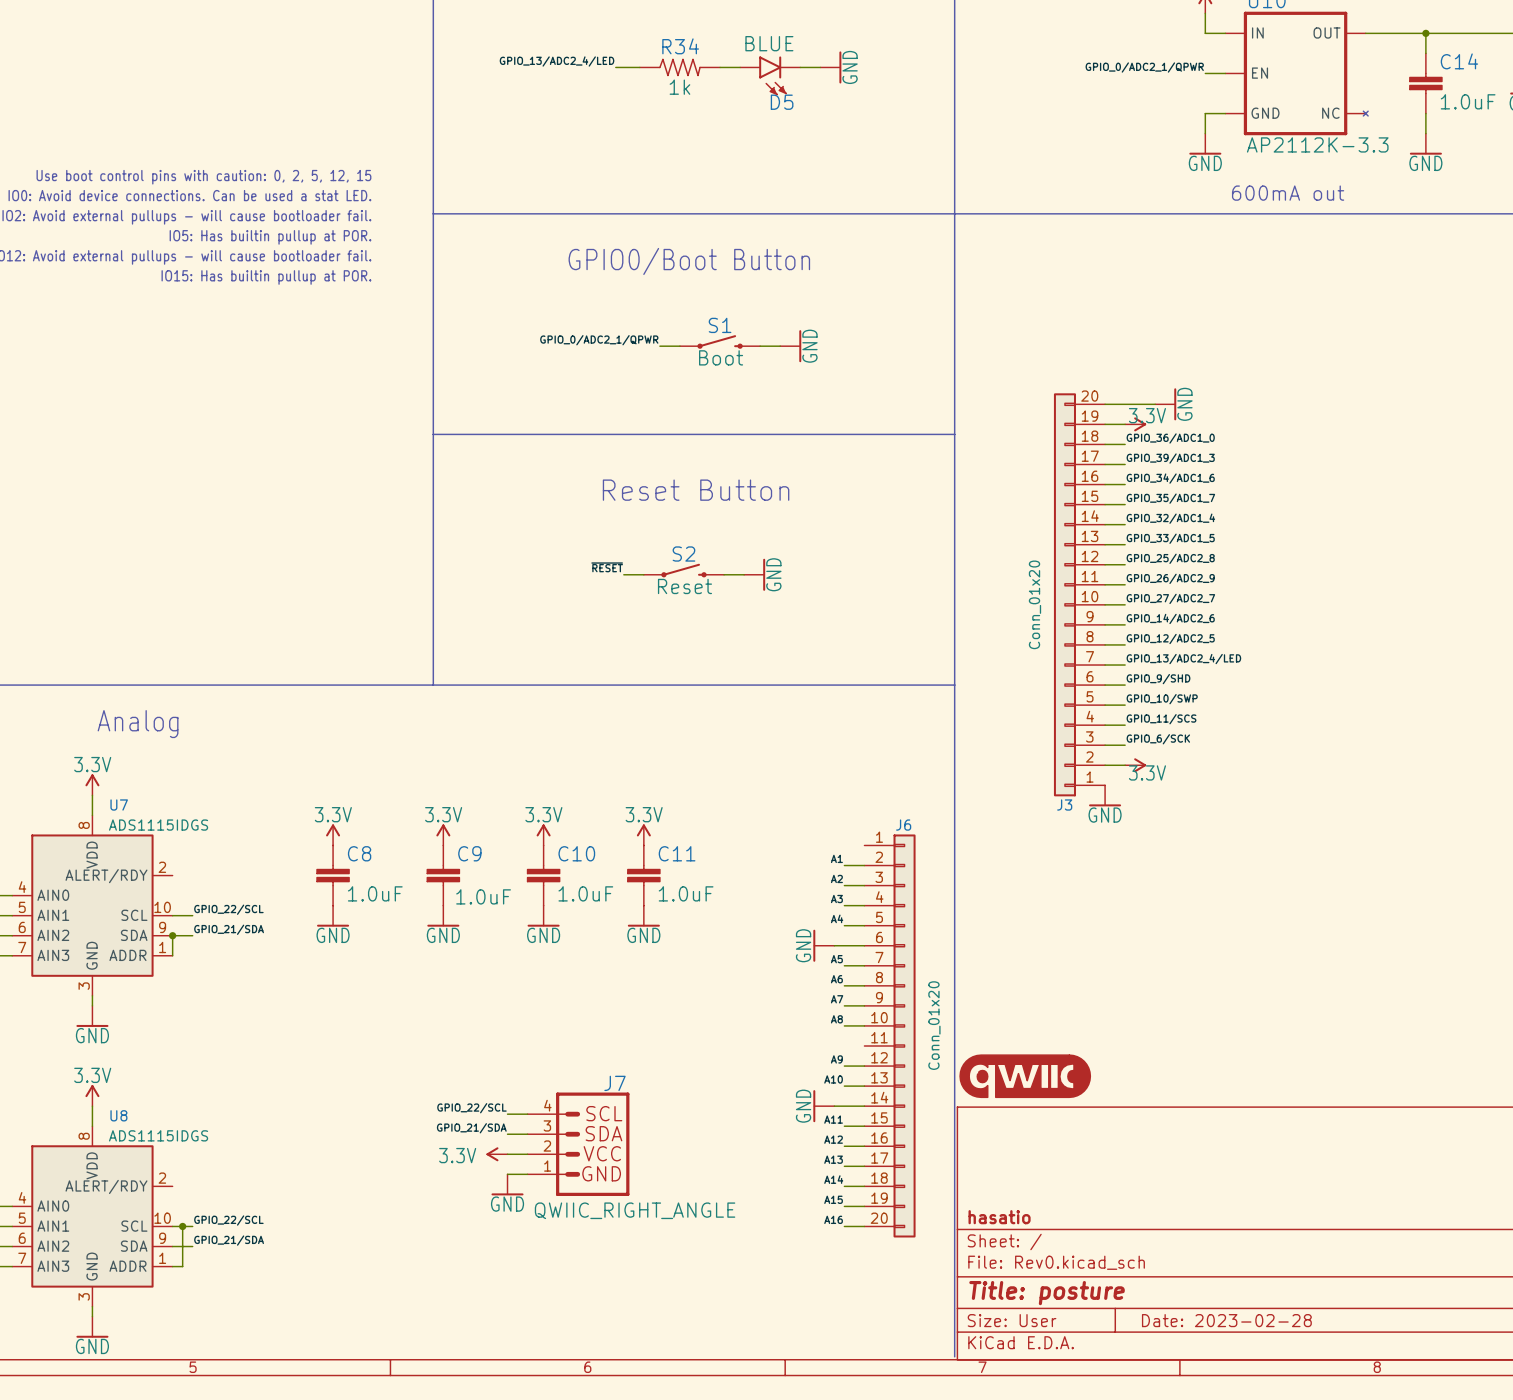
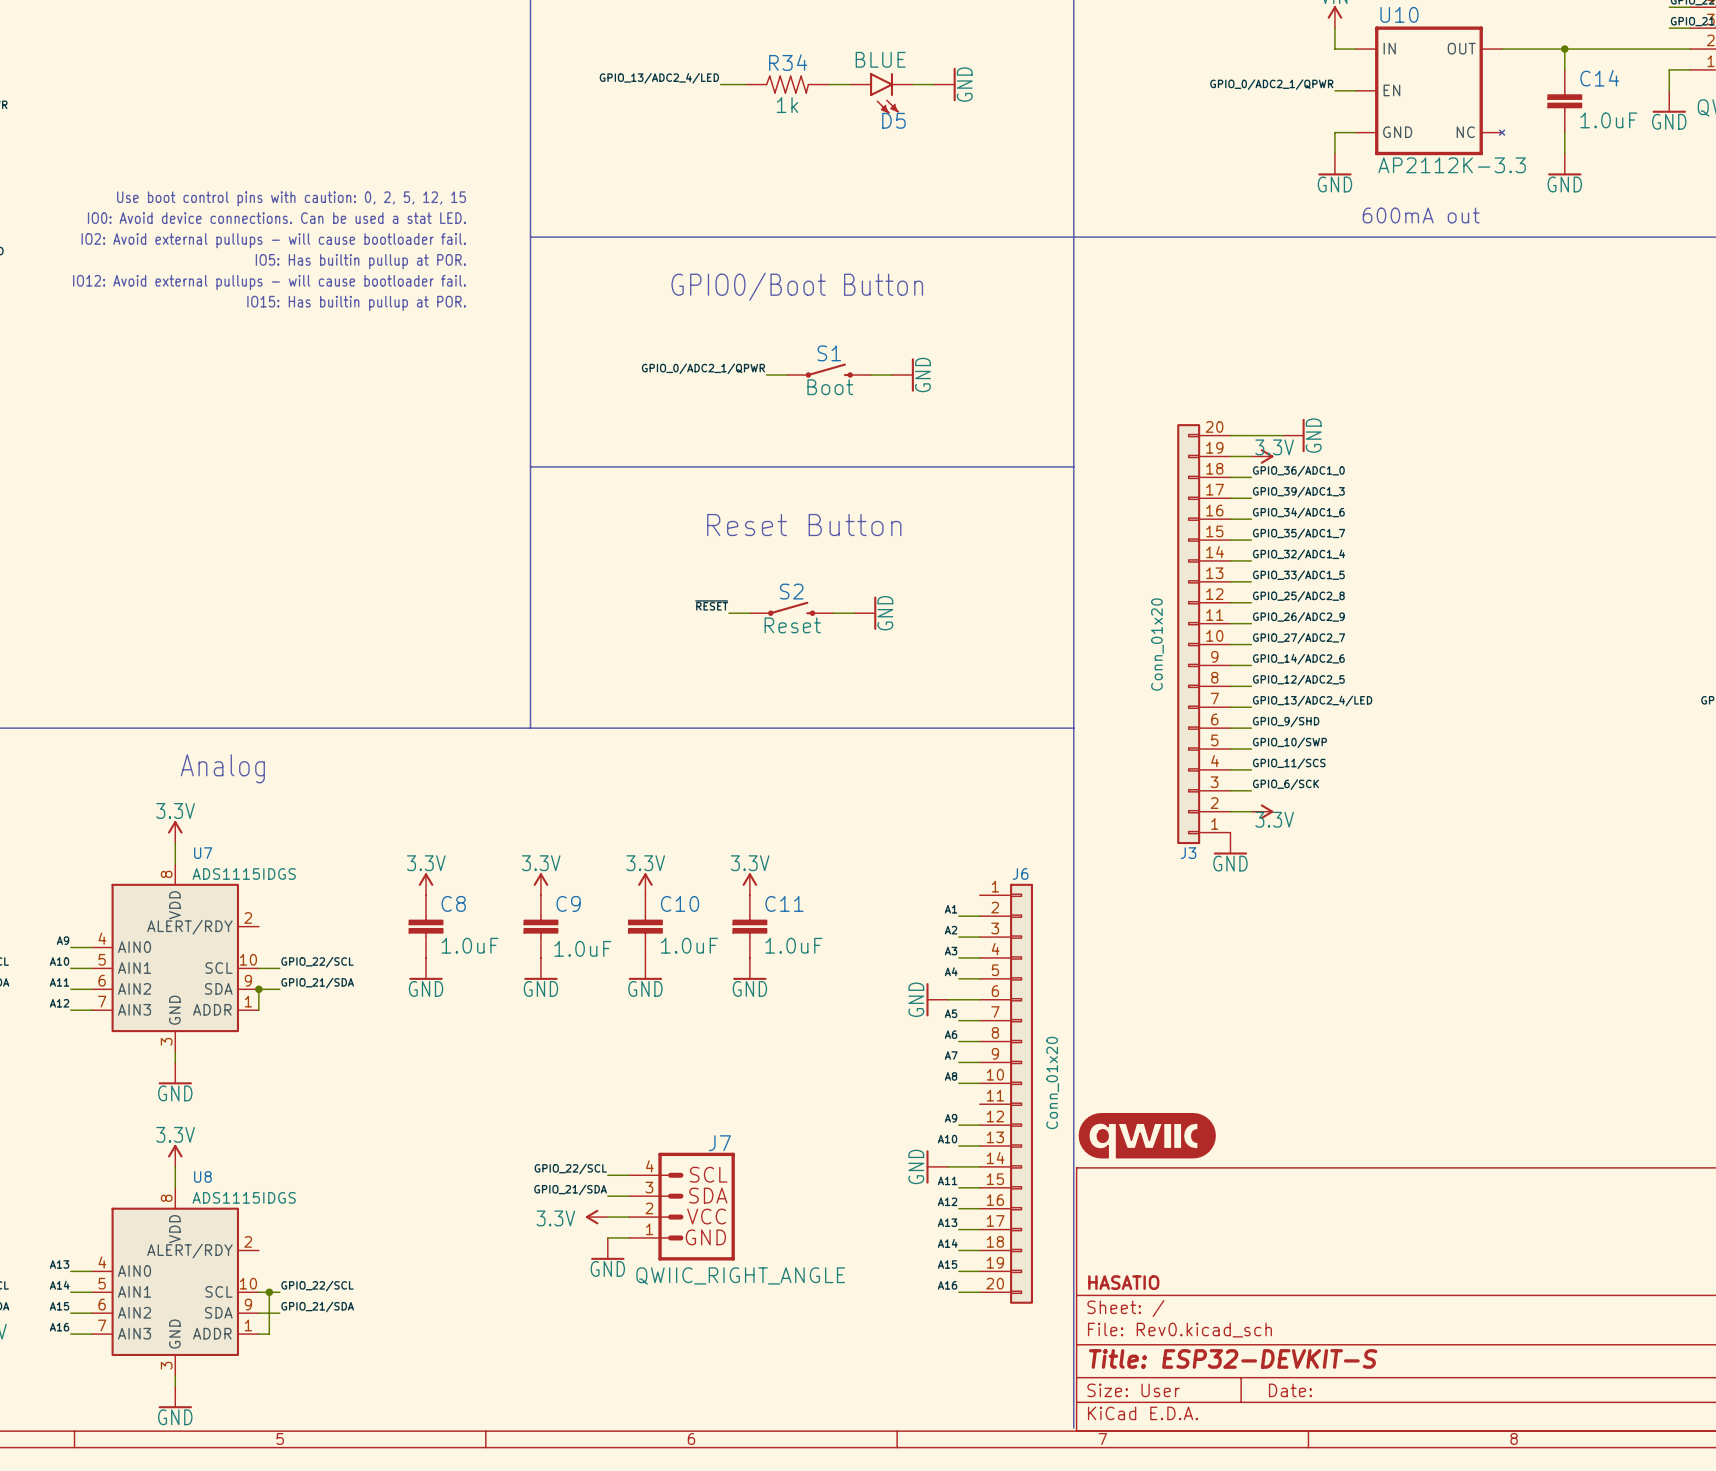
title block: hasatio (999, 1217) -> HASATIO (1123, 1282)
title block: Title: posture (1047, 1293) -> Title: ESP32-DEVKIT-S (1233, 1358)
title block: Date: 2023-02-28 (1226, 1320) -> Date: (1290, 1390)

